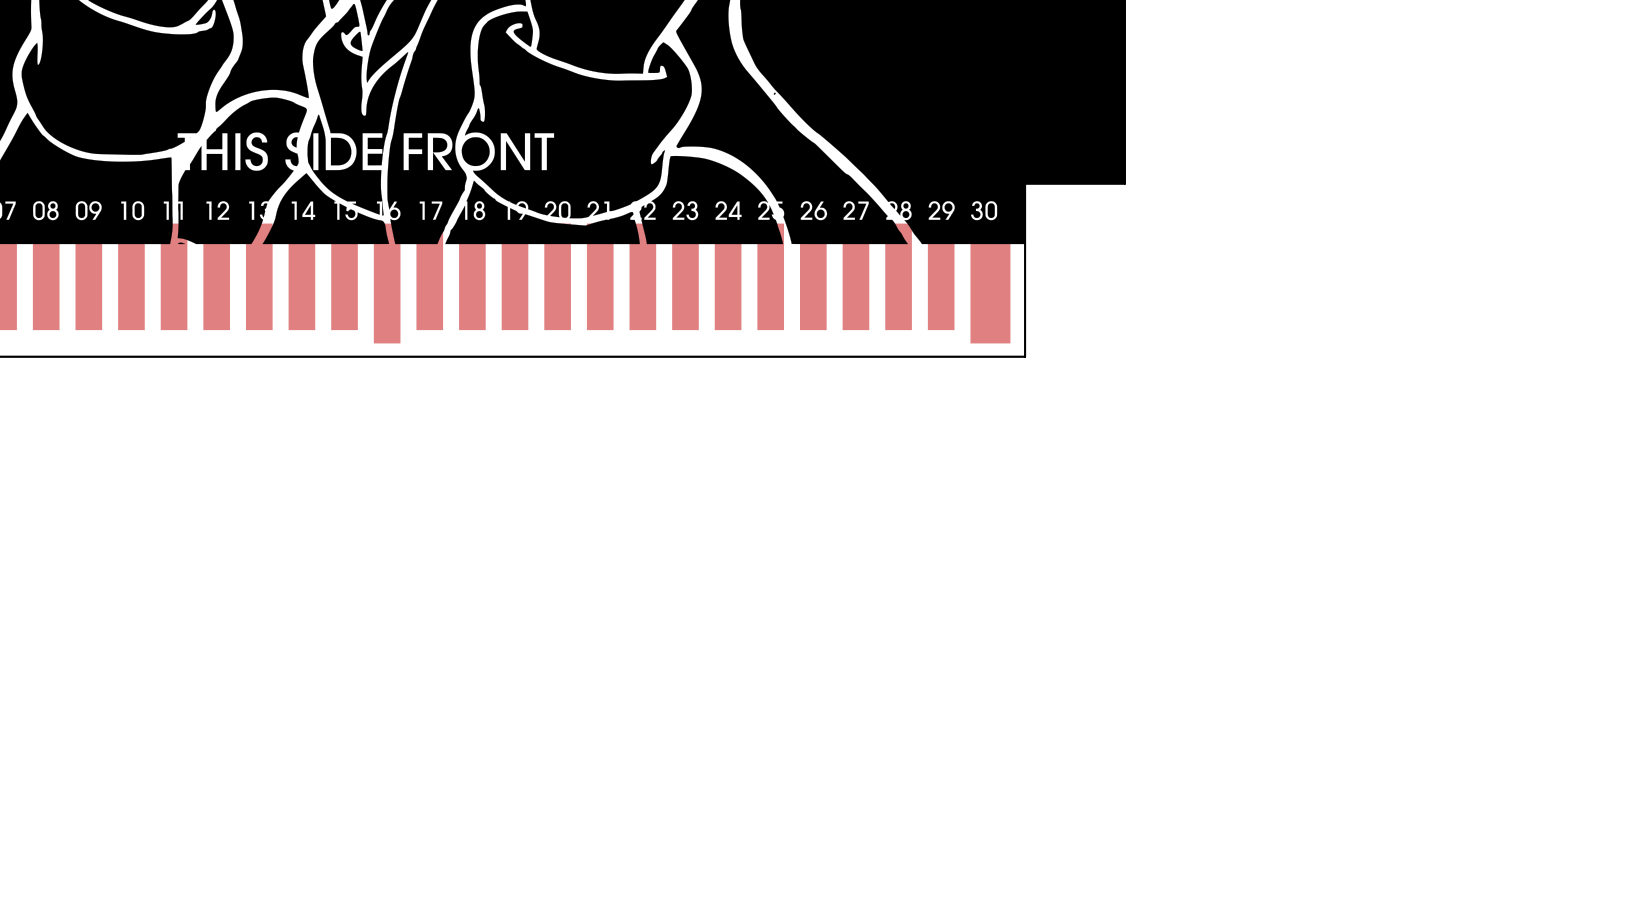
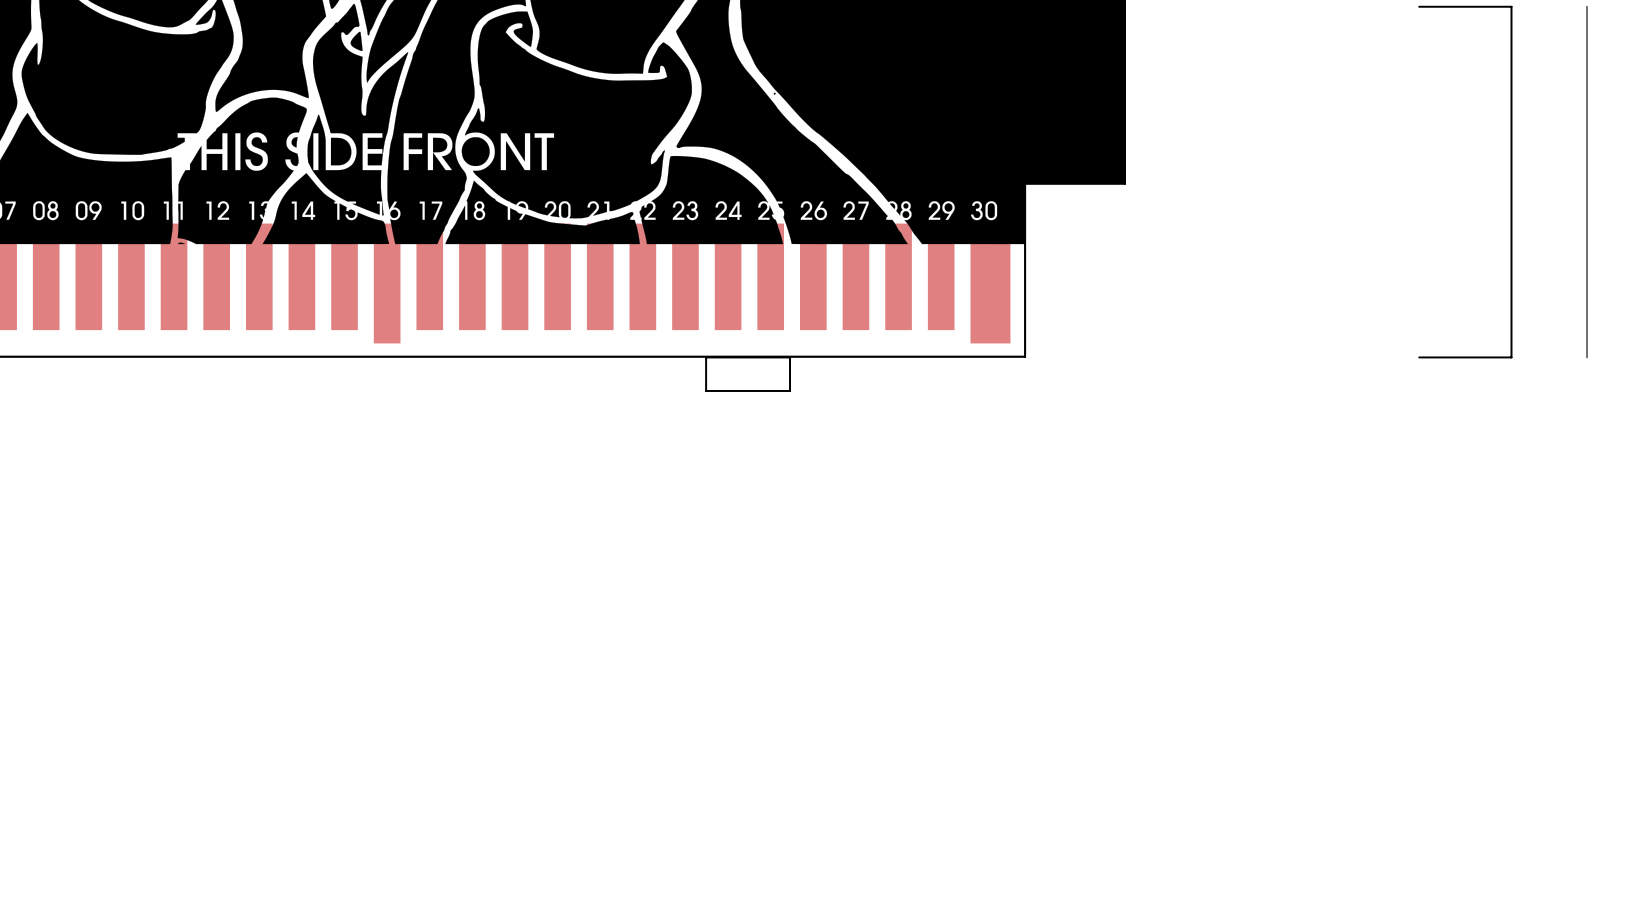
board edge: none -> (1419, 6) (1511, 6) (1511, 357) (1419, 357)
line: none -> (1586, 6) (1586, 357)
board edge: none -> (706, 357) (790, 357) (790, 390) (706, 390) (706, 357)

